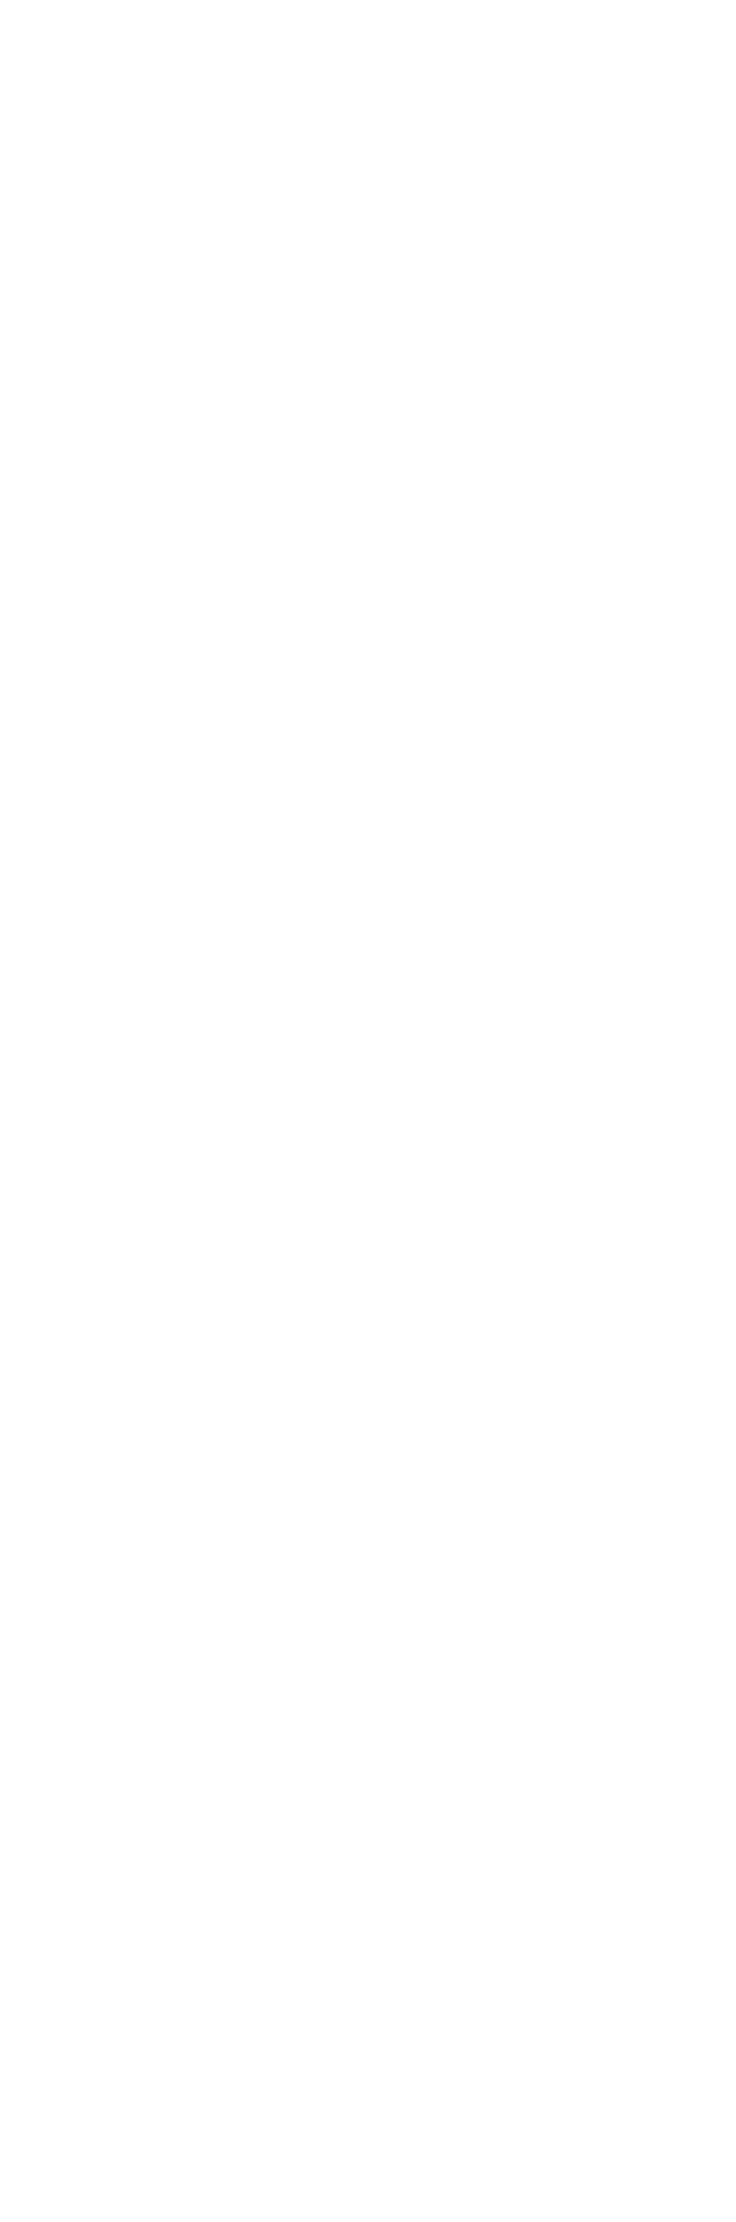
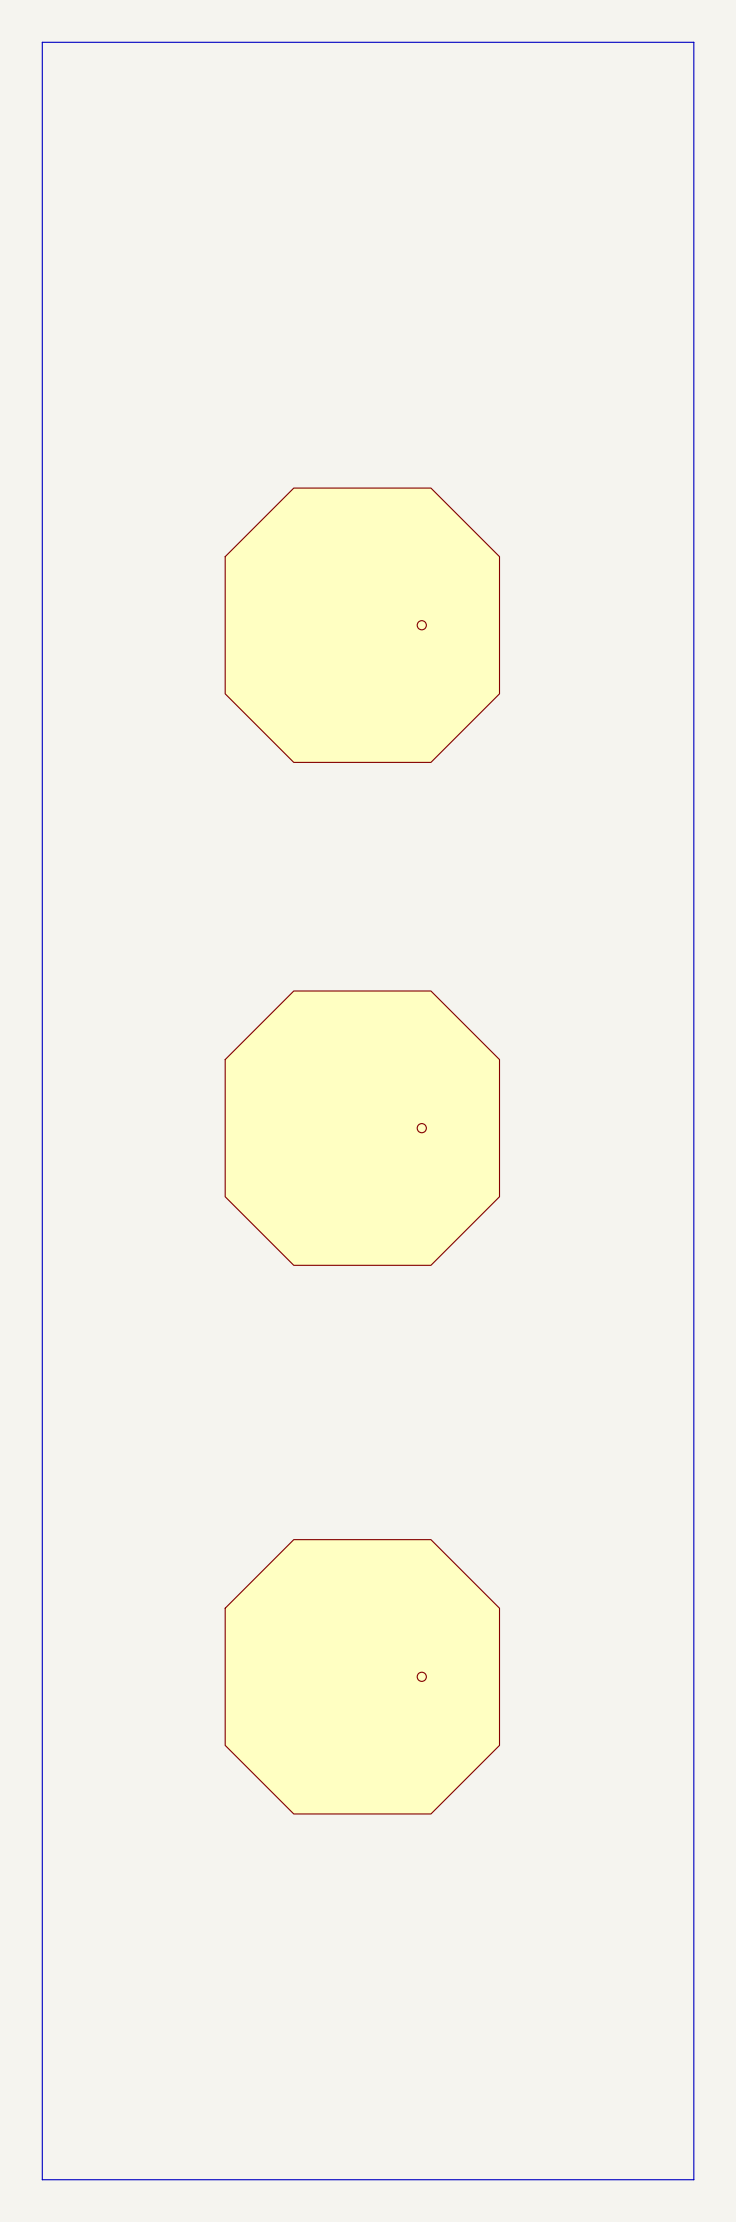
line: none -> (42, 42) (693, 42) (693, 2179) (42, 2179) (42, 42)
part: none -> (362, 625)
part: none -> (362, 1128)
part: none -> (362, 1676)

